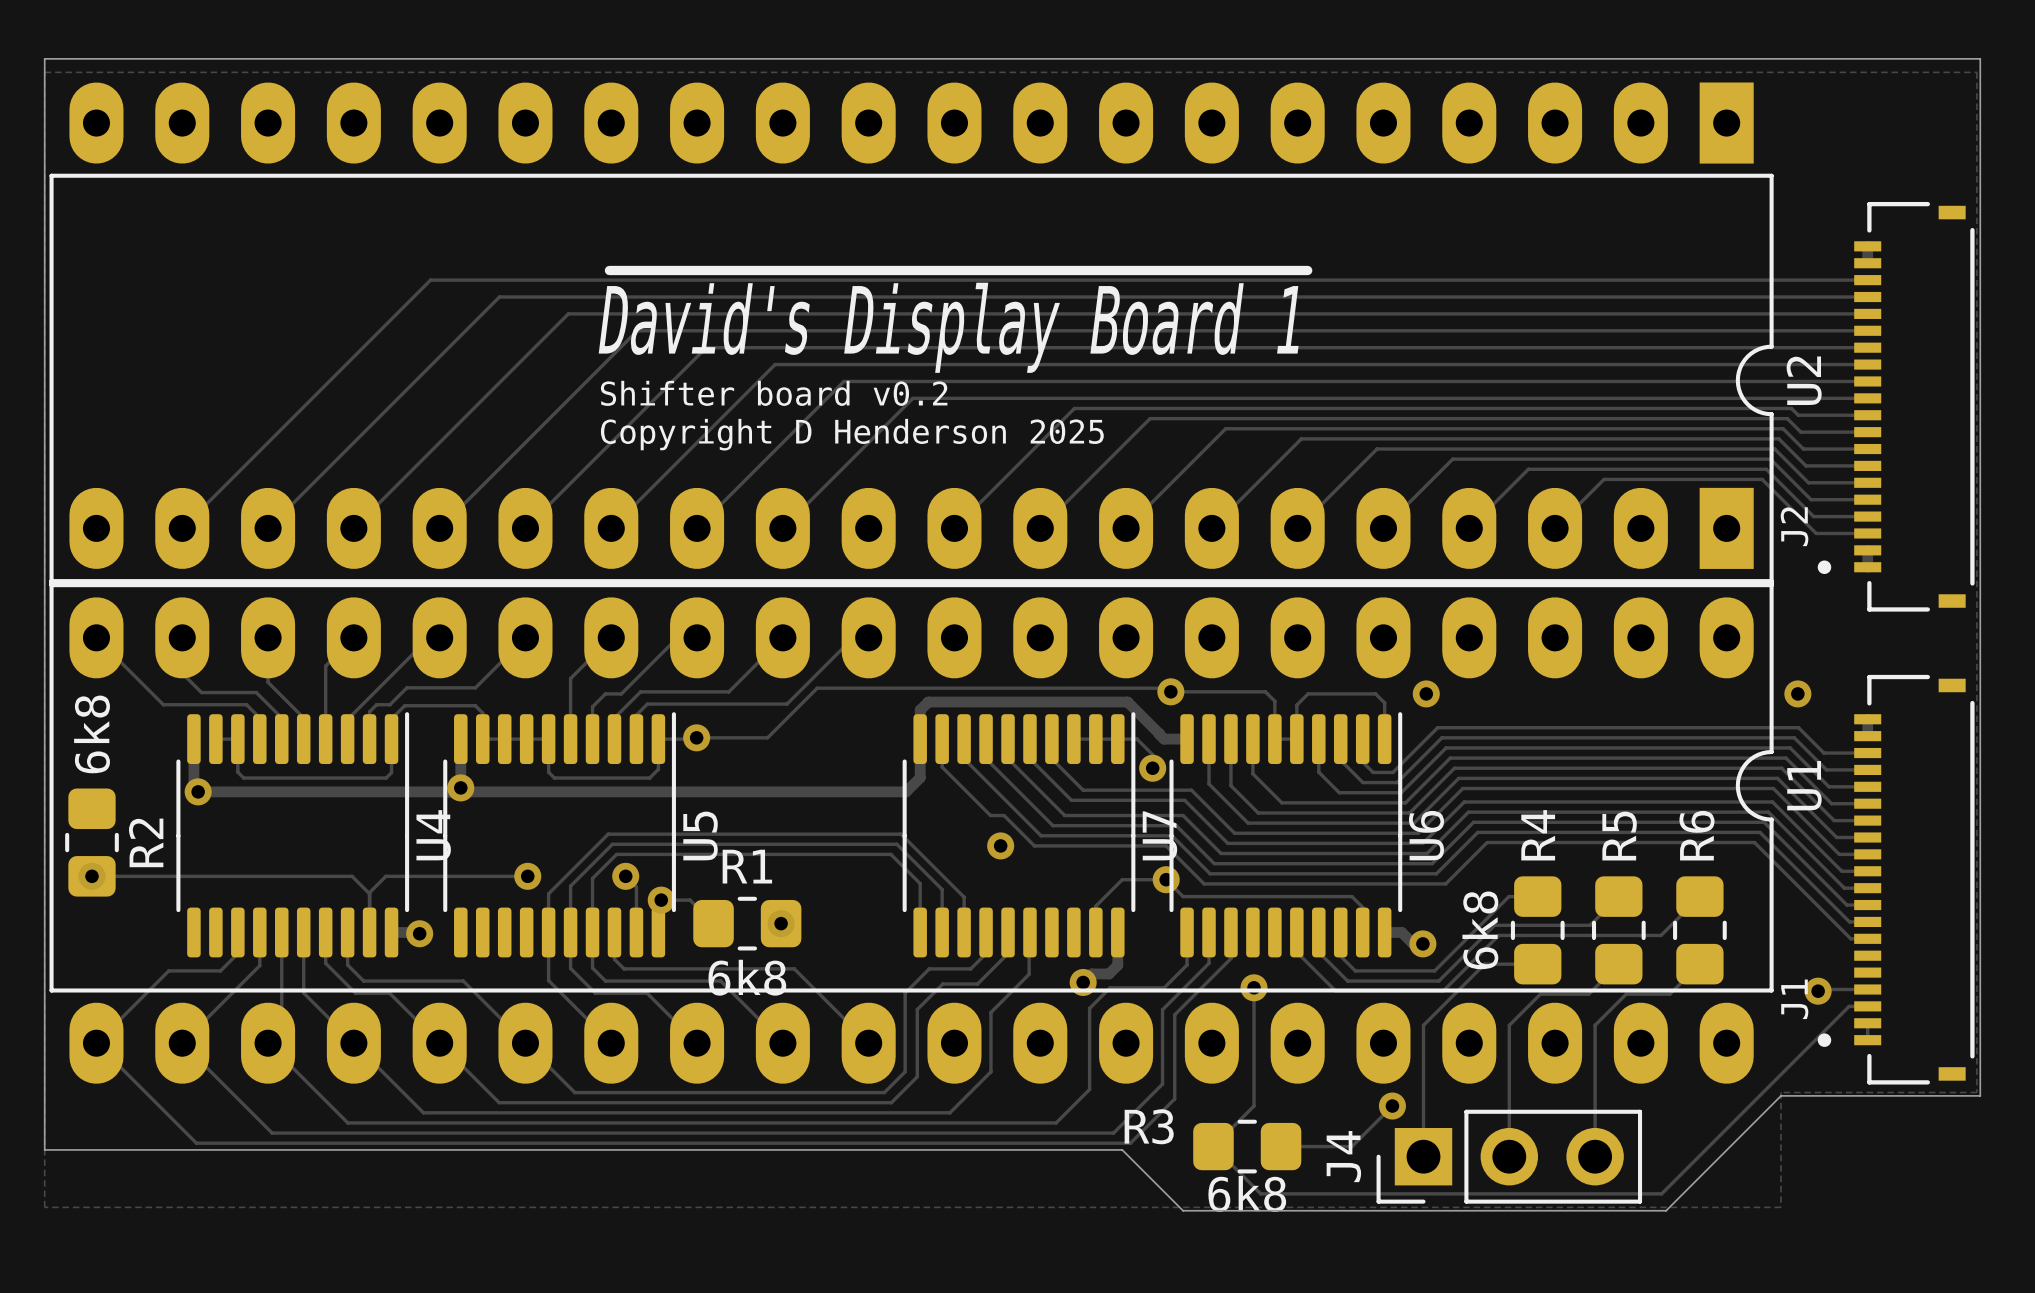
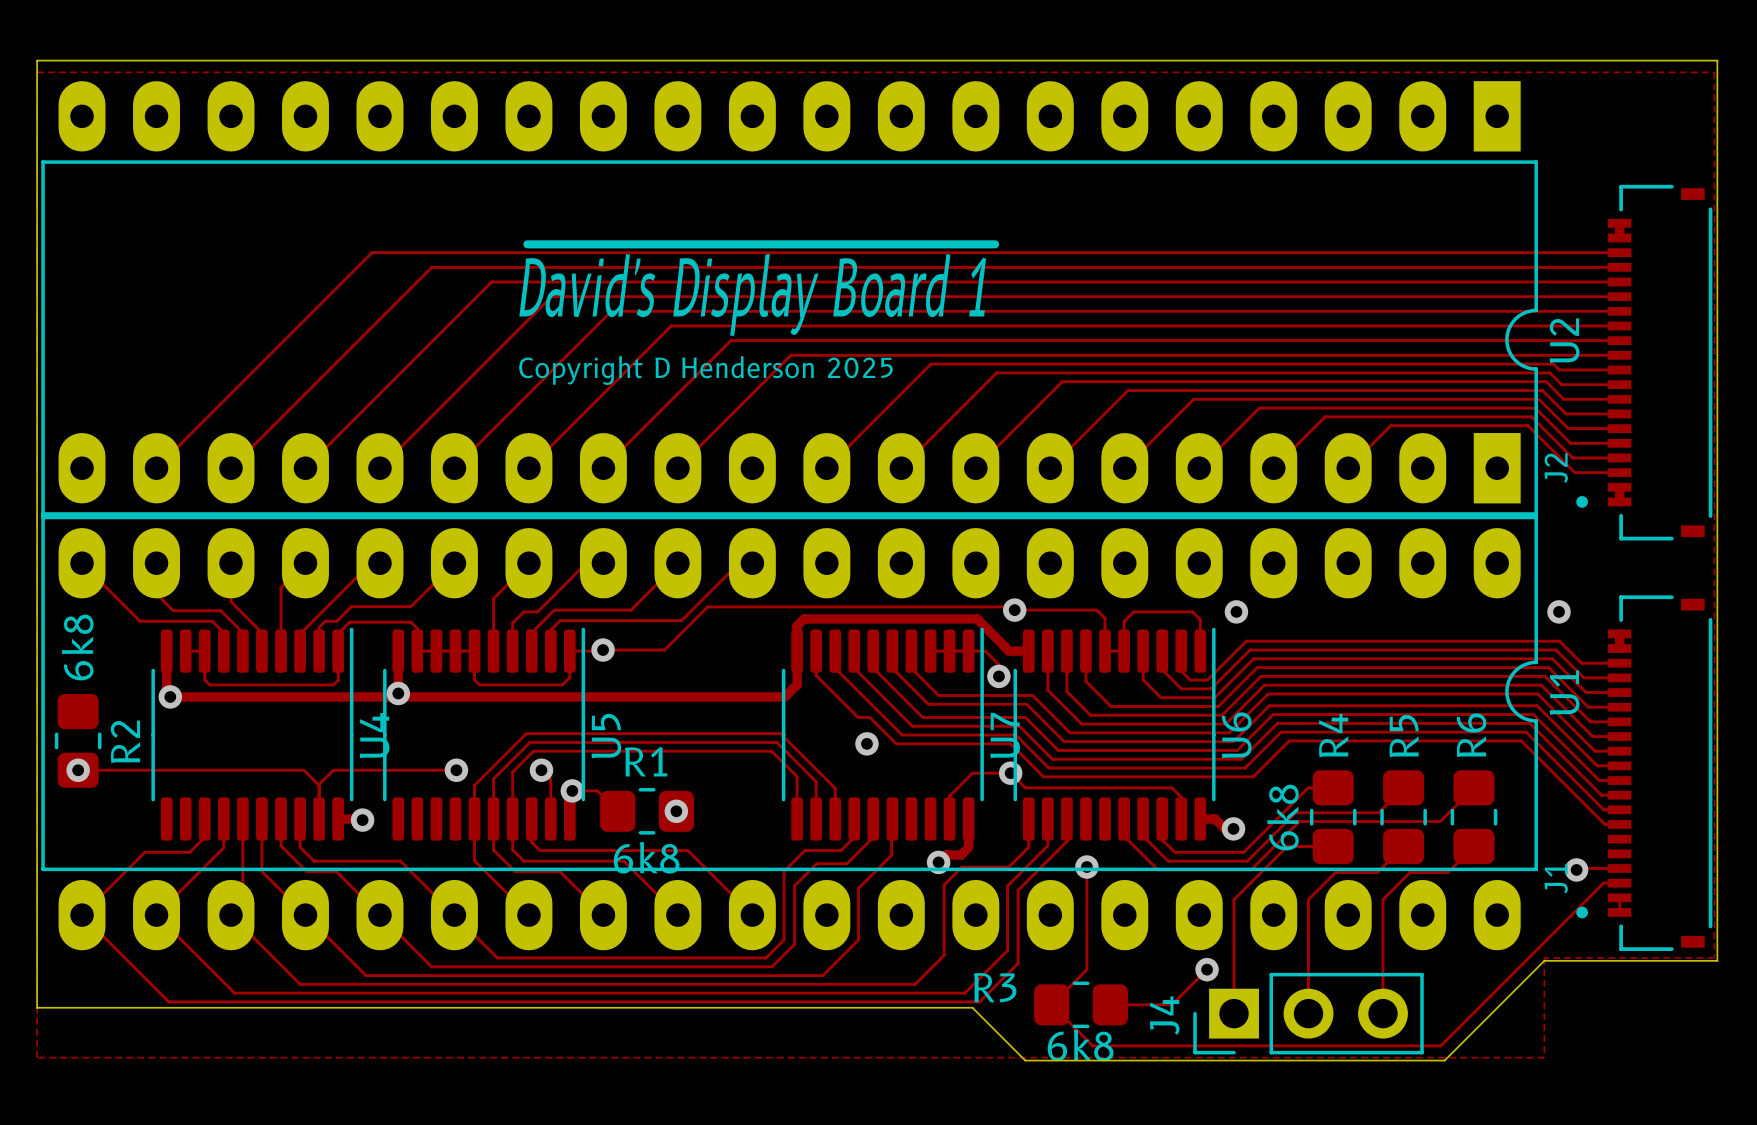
text: Shifter board v0.2 (774, 393) -> none
text position: Copyright D Henderson 2025 (852, 434) -> Copyright D Henderson 2025 (705, 370)

